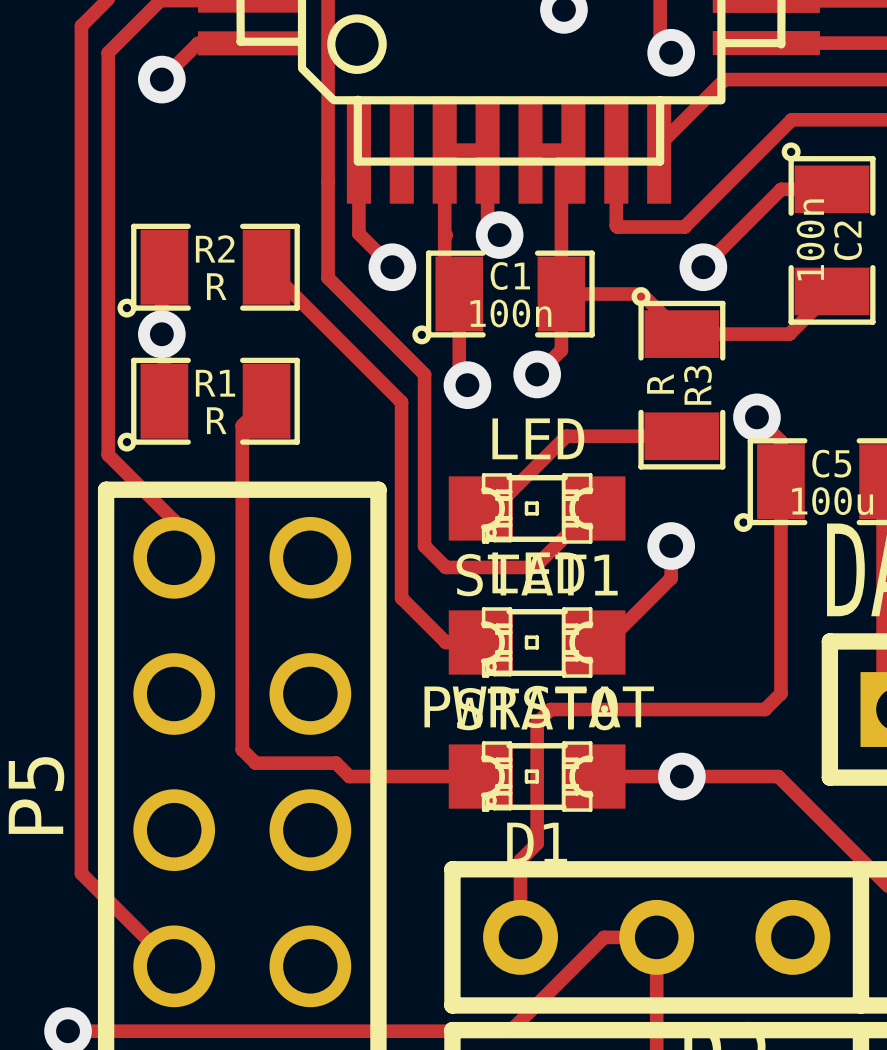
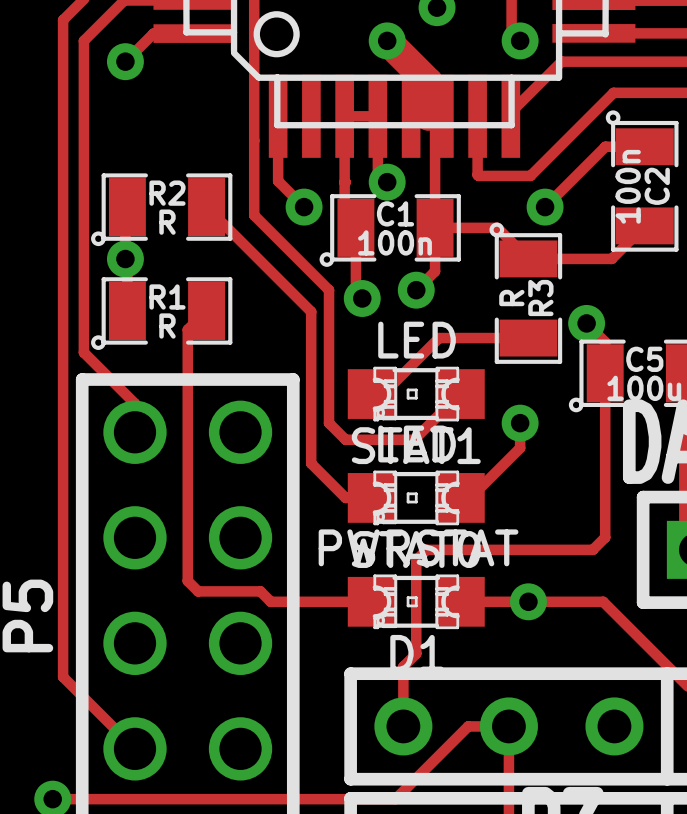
track: none -> (387, 40) (428, 82) (428, 116)
via: none -> (387, 40)

